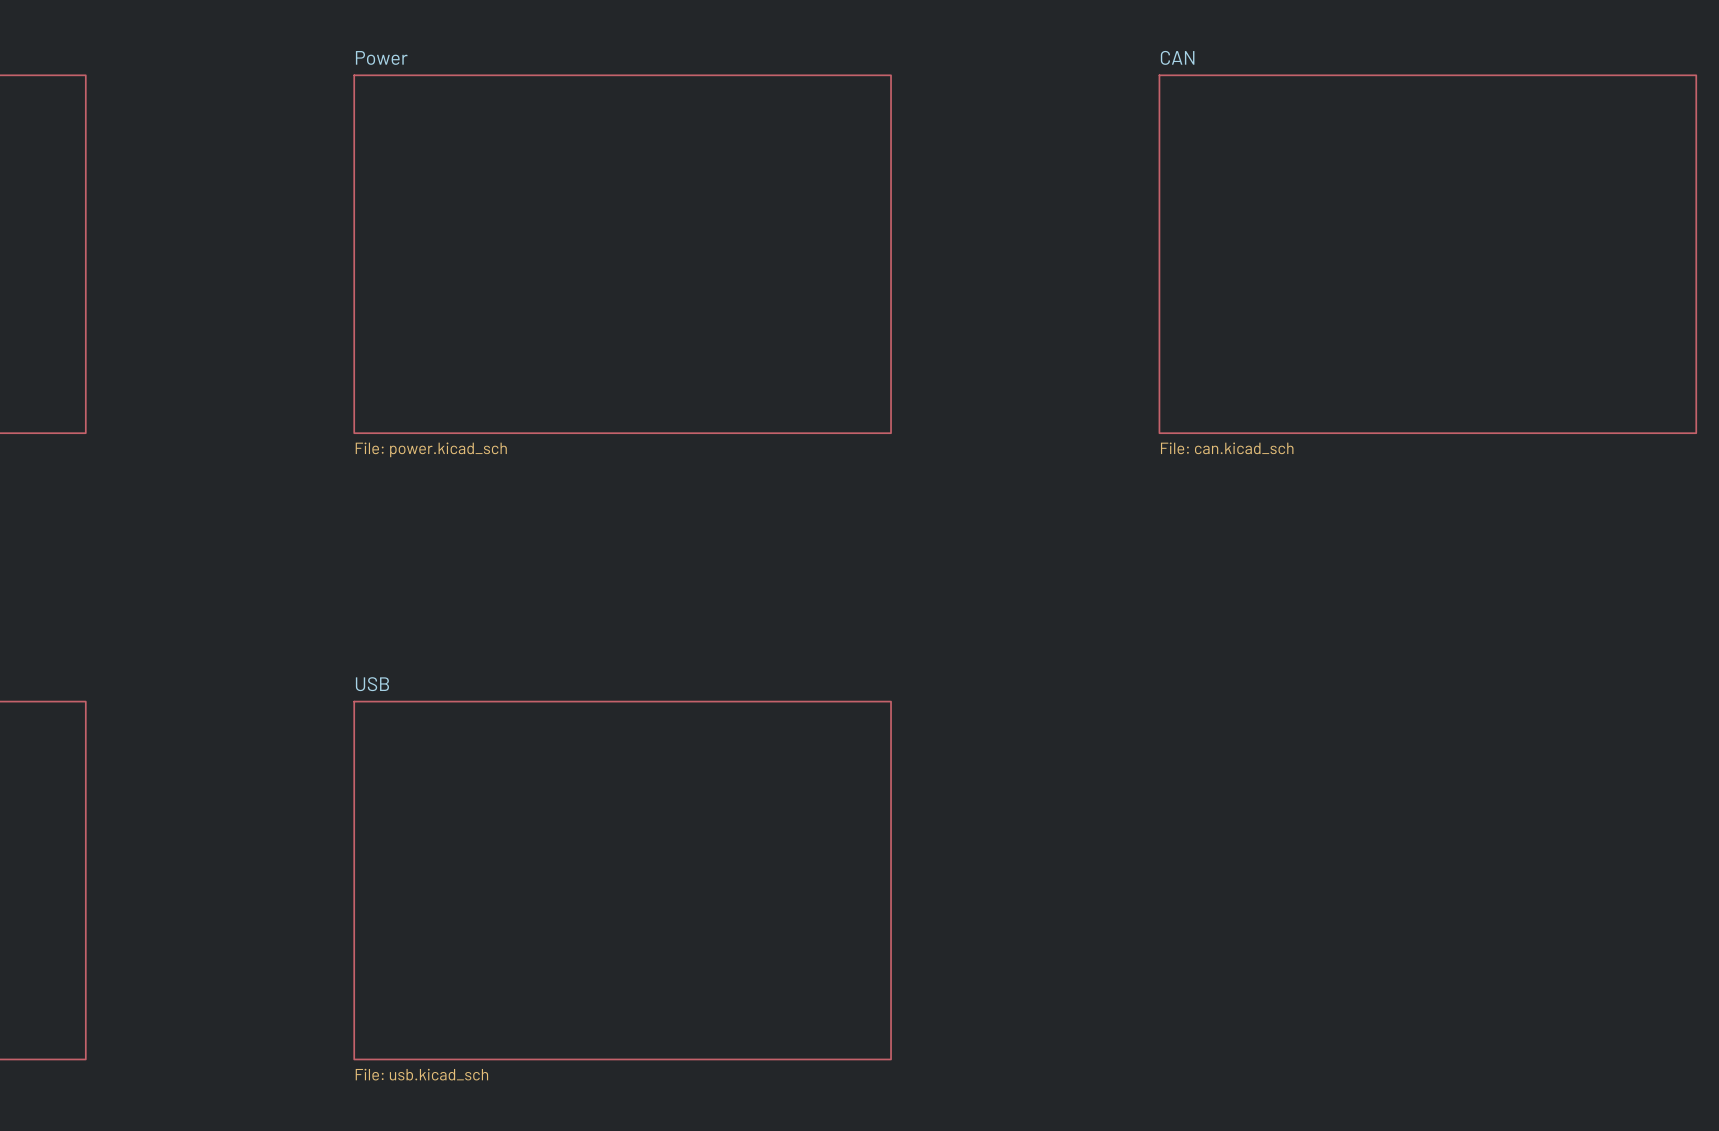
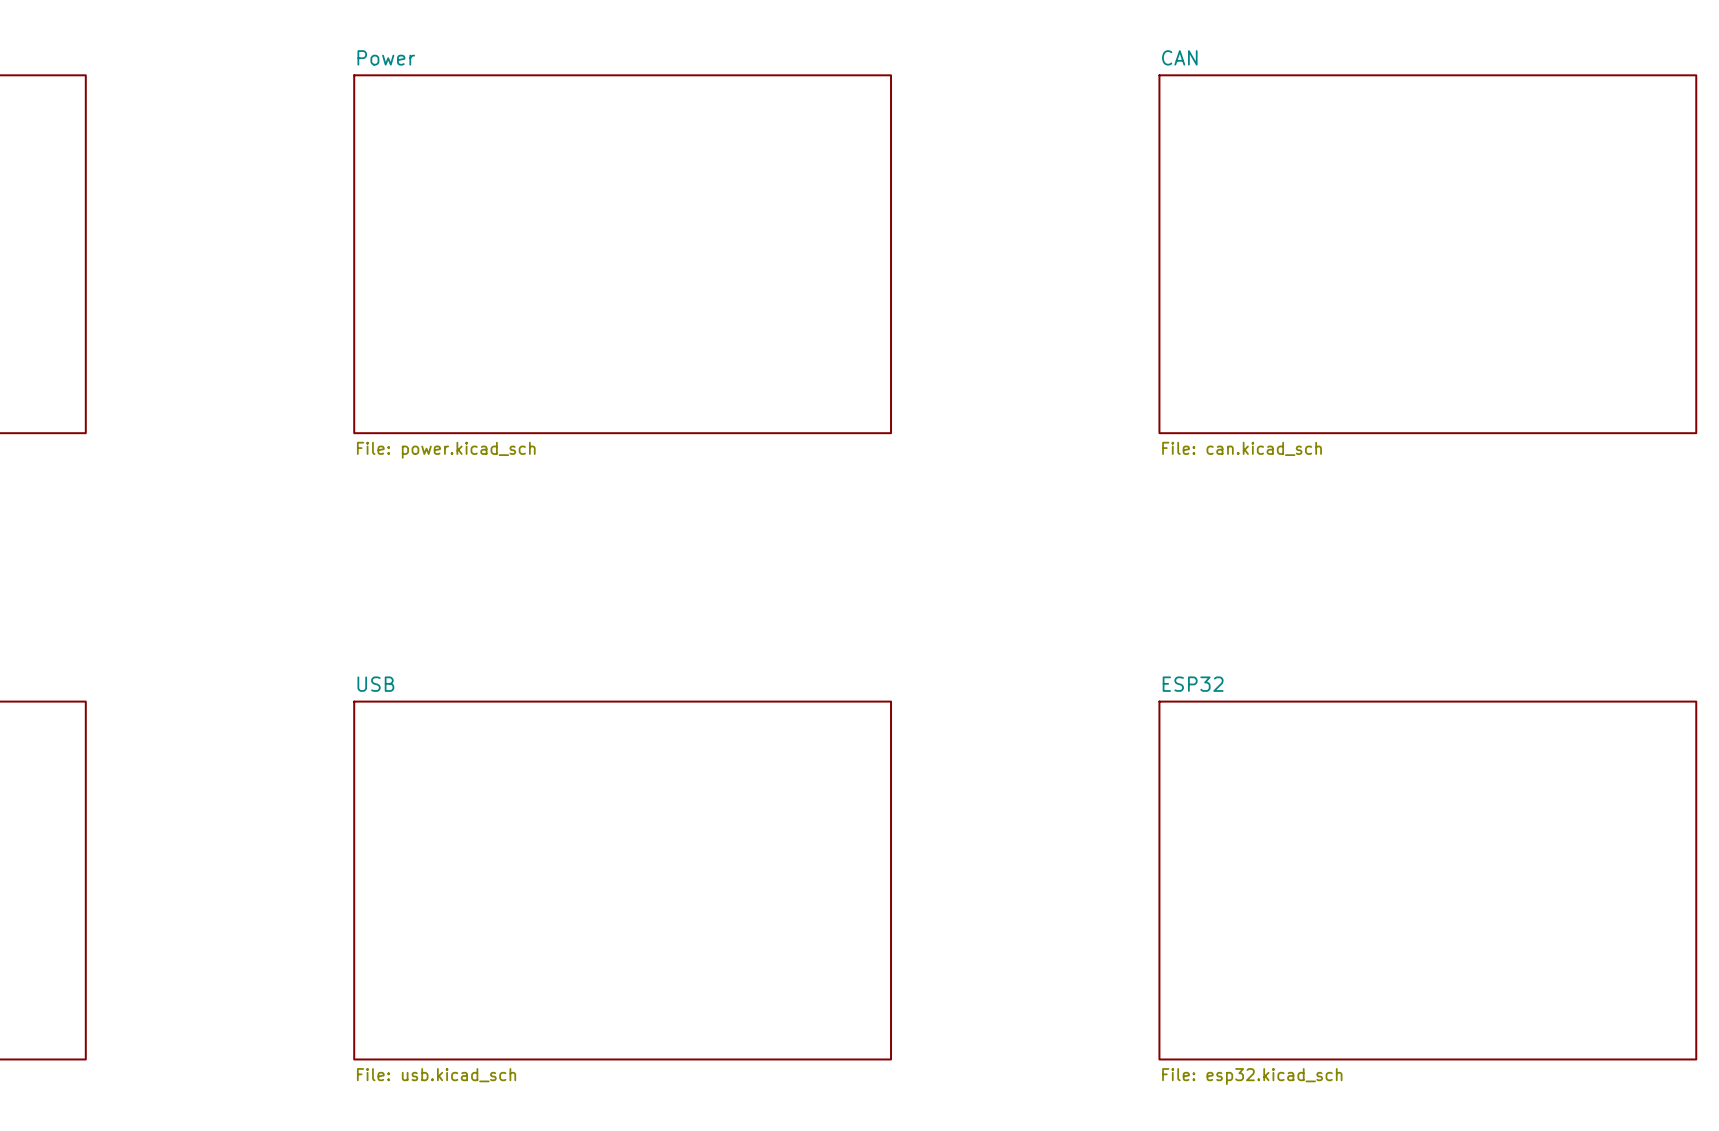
sheet ESP32: none -> File: esp32.kicad_sch (1427, 880)

